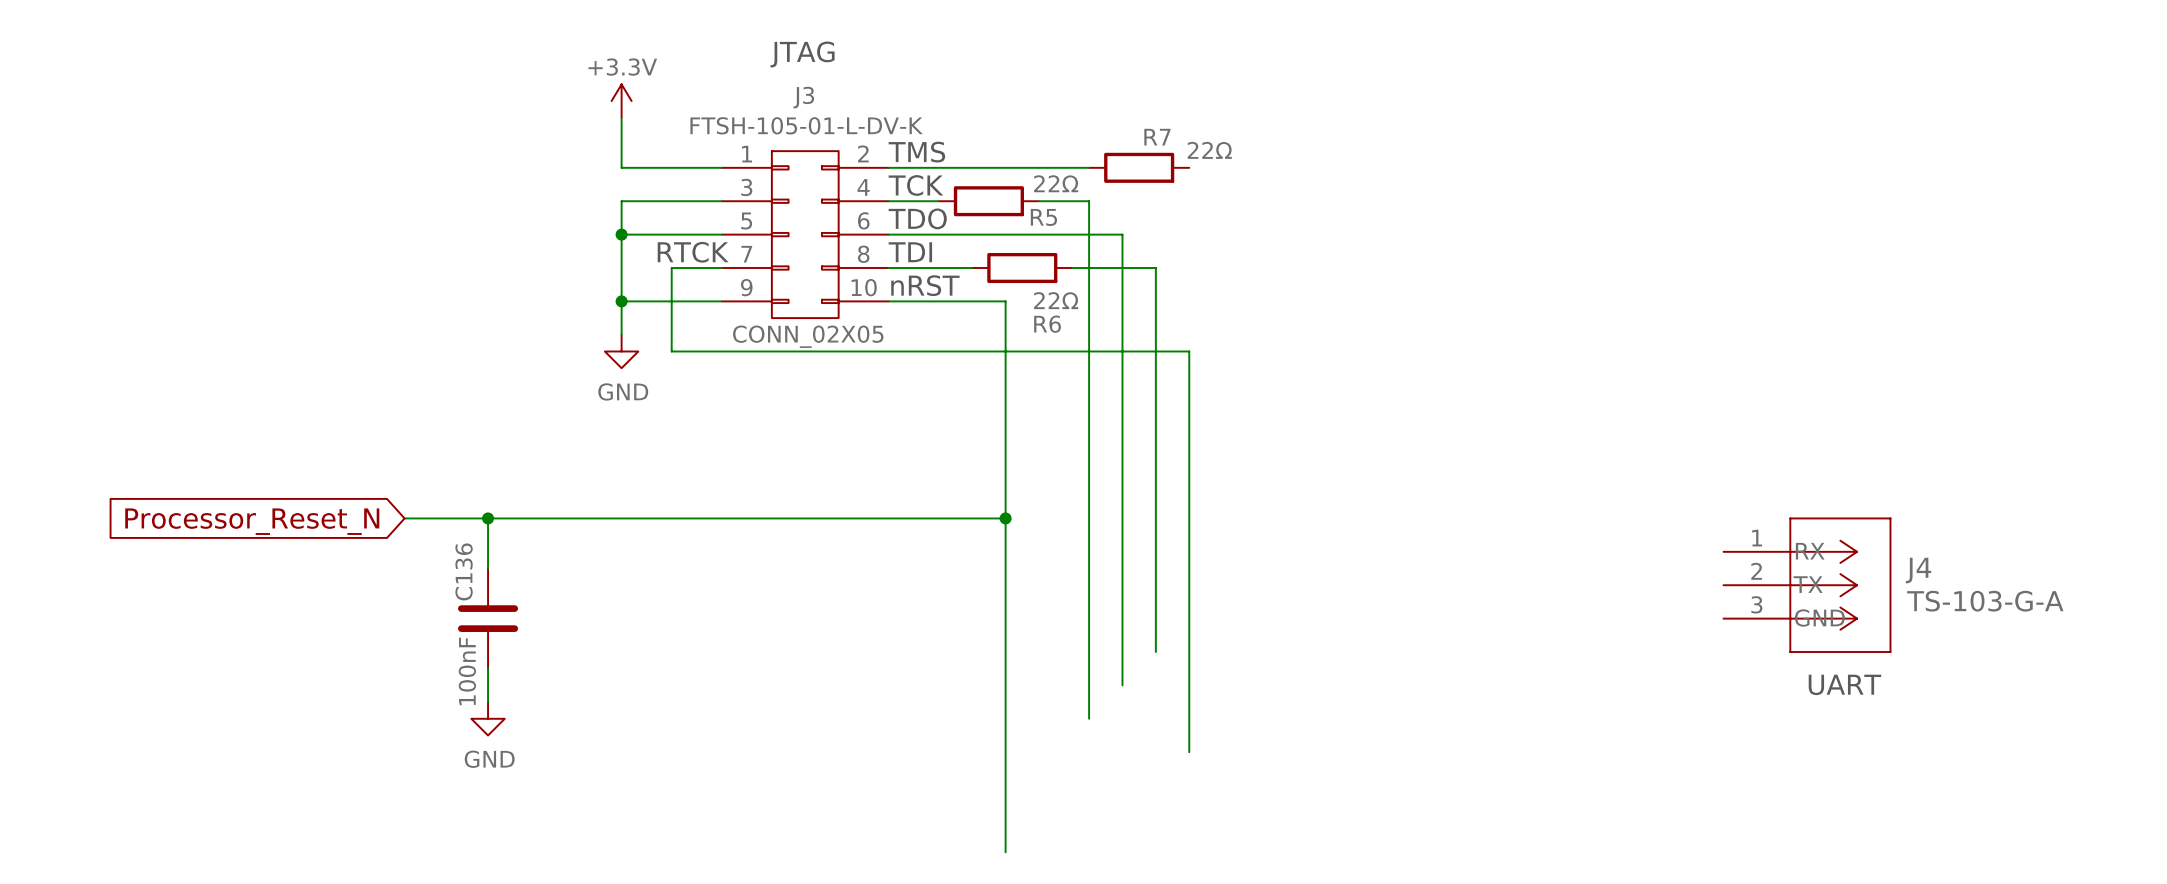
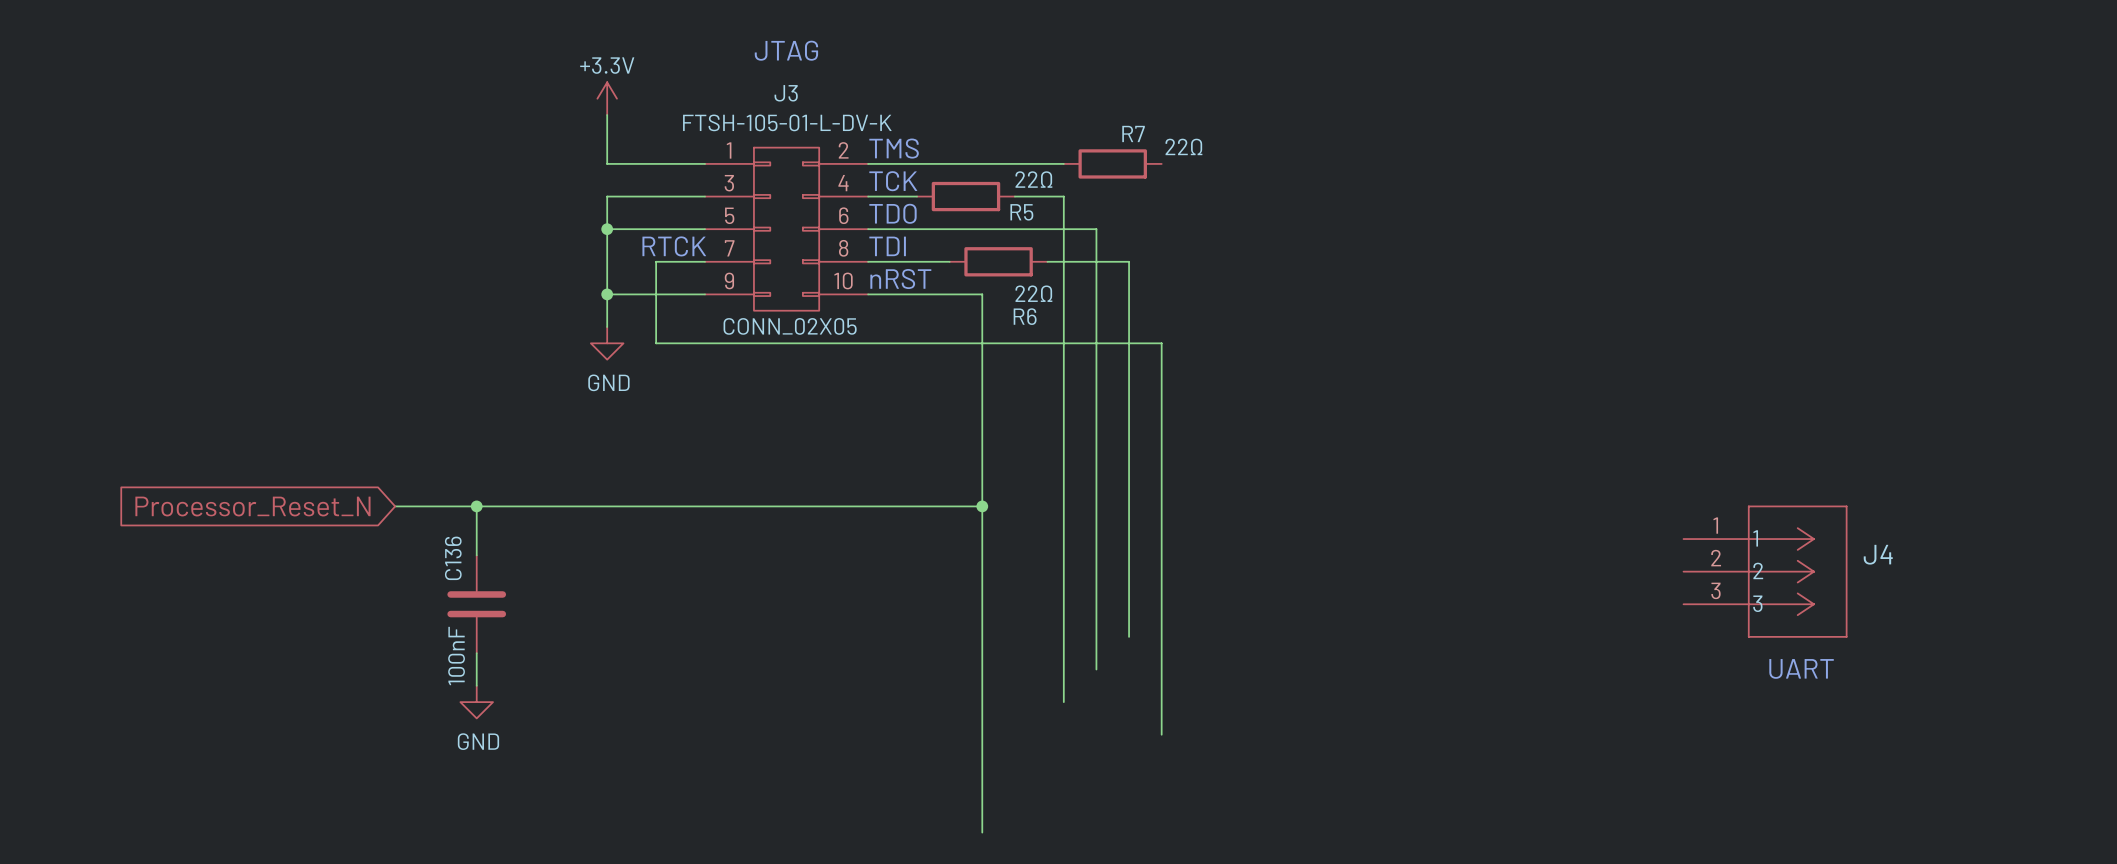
J4 pin name: RX (1810, 551) -> 1 (1755, 538)
J4 pin name: TX (1808, 584) -> 2 (1758, 570)
J4 value: TS-103-G-A (1985, 601) -> none
J4 pin name: GND (1819, 618) -> 3 (1757, 603)

